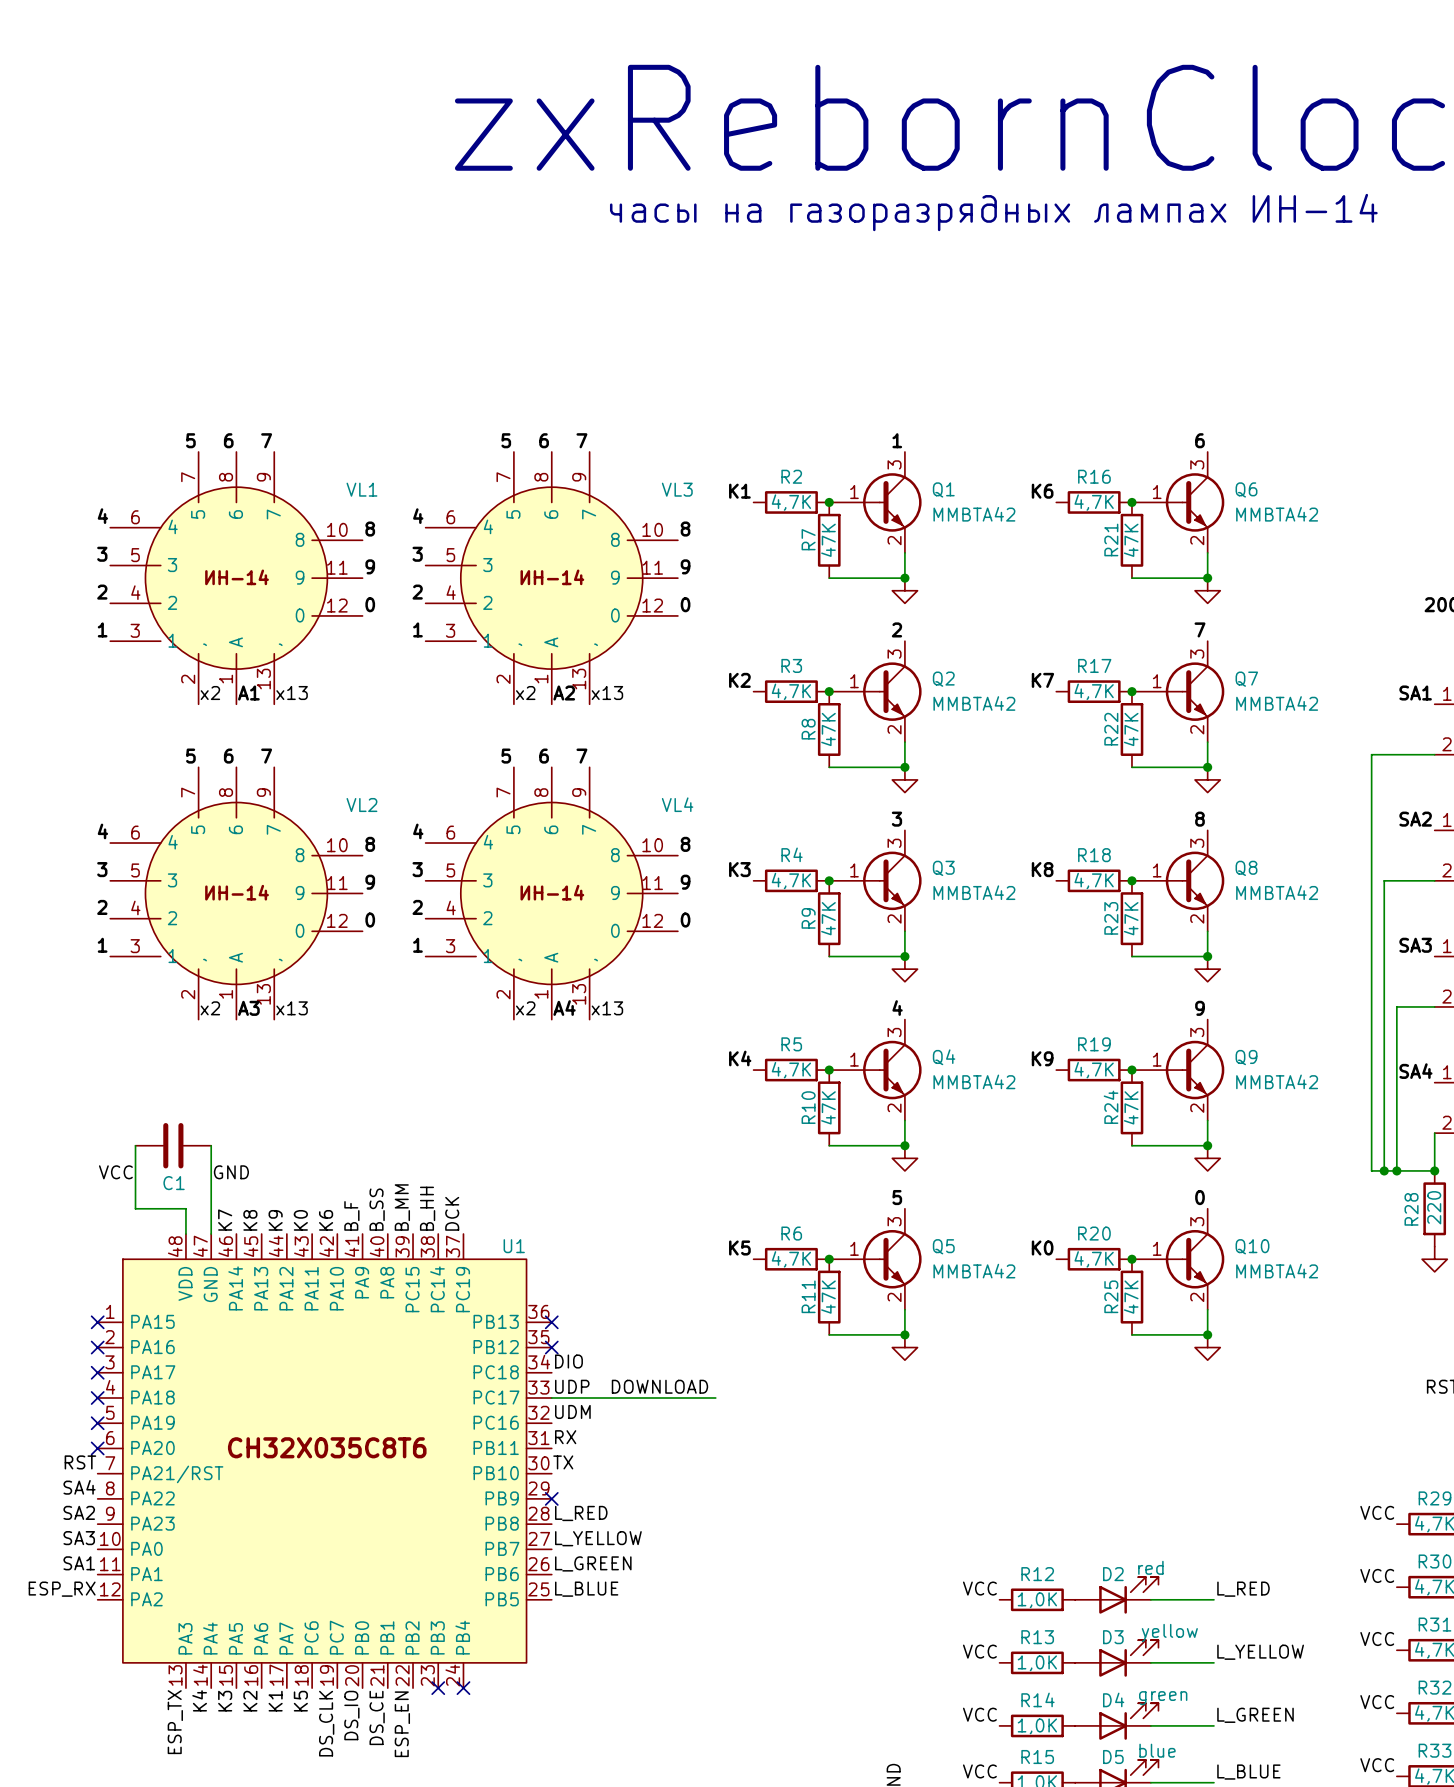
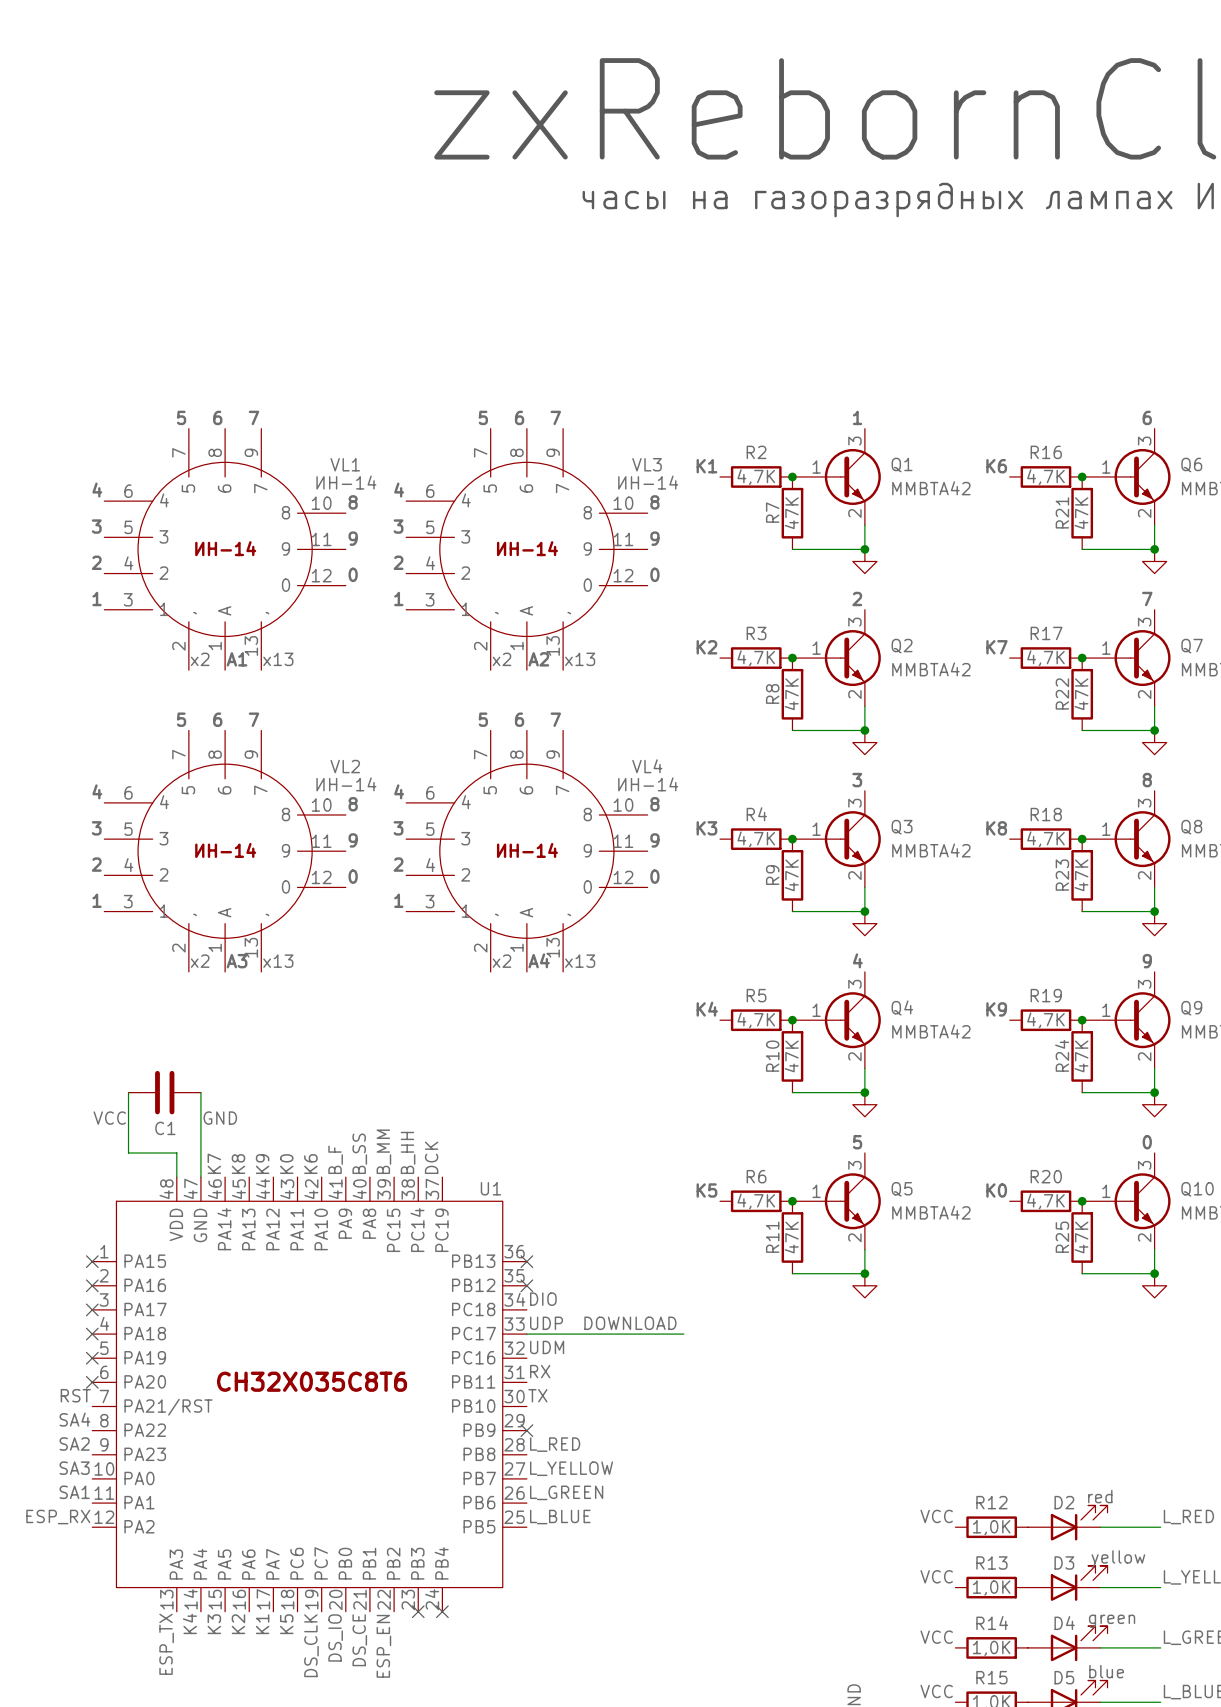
VL1 value: none -> ИН-14 (346, 482)
VL3 value: none -> ИН-14 (648, 482)
VL2 value: none -> ИН-14 (346, 784)
VL4 value: none -> ИН-14 (648, 784)

